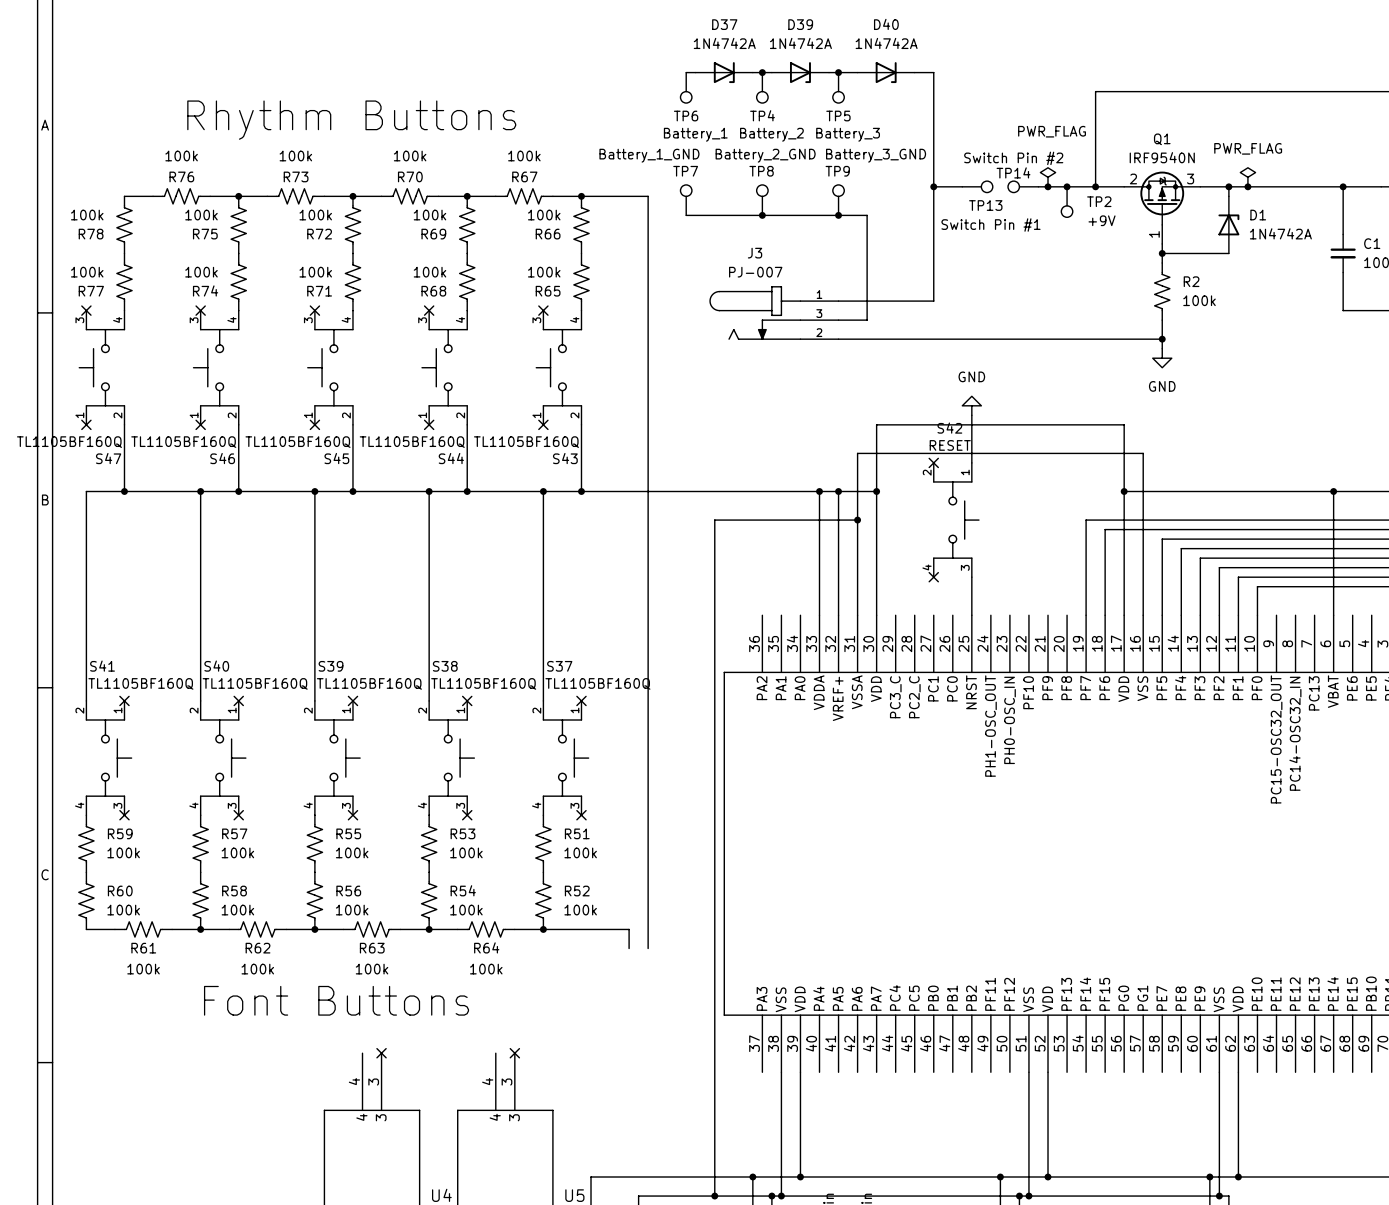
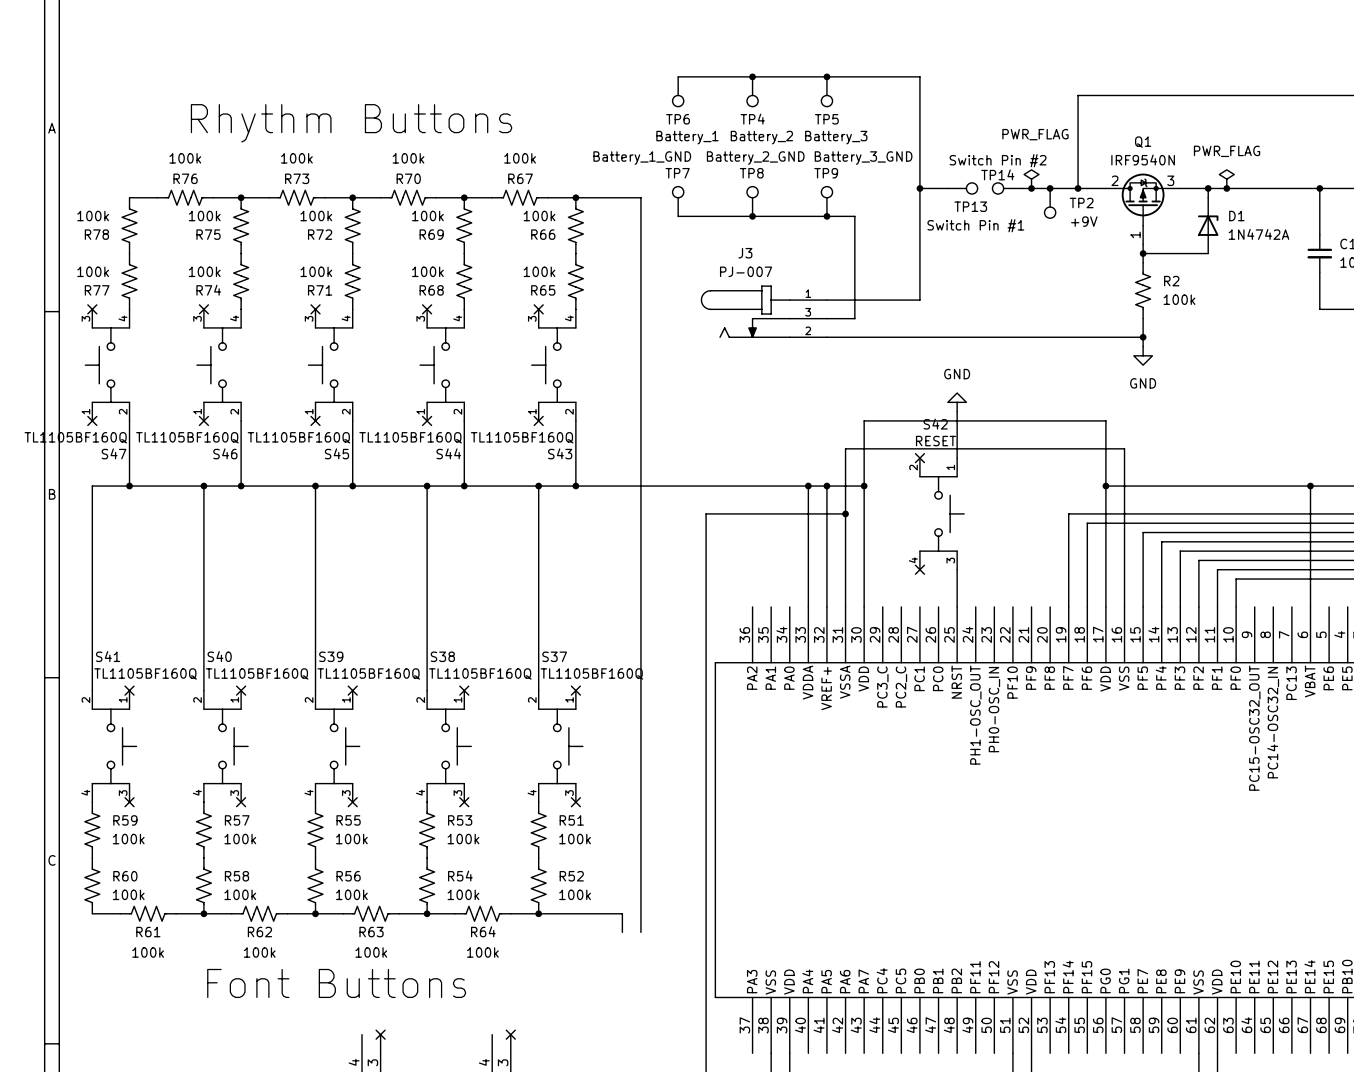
D37: 1N4742A (724, 72) -> none
D39: 1N4742A (800, 72) -> none
D40: 1N4742A (886, 72) -> none

